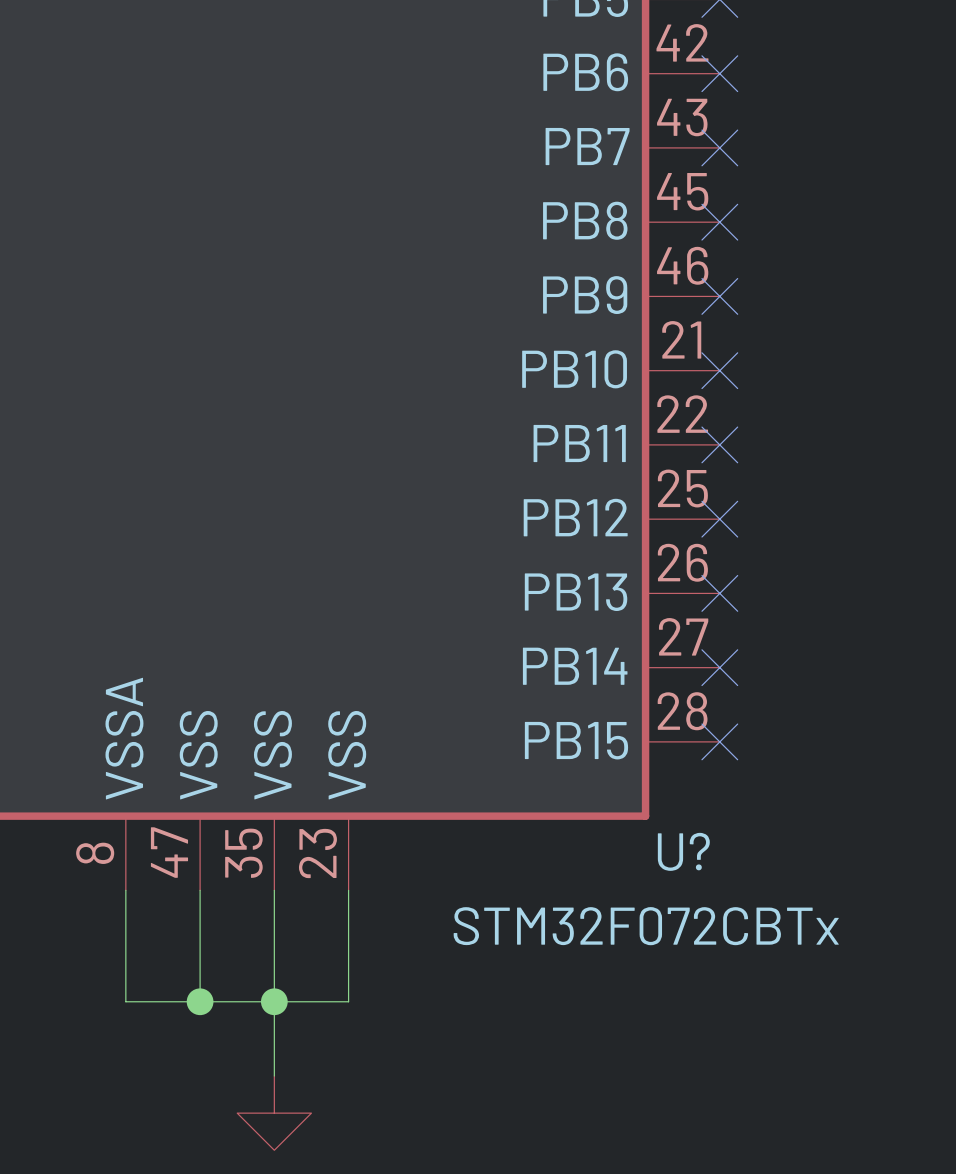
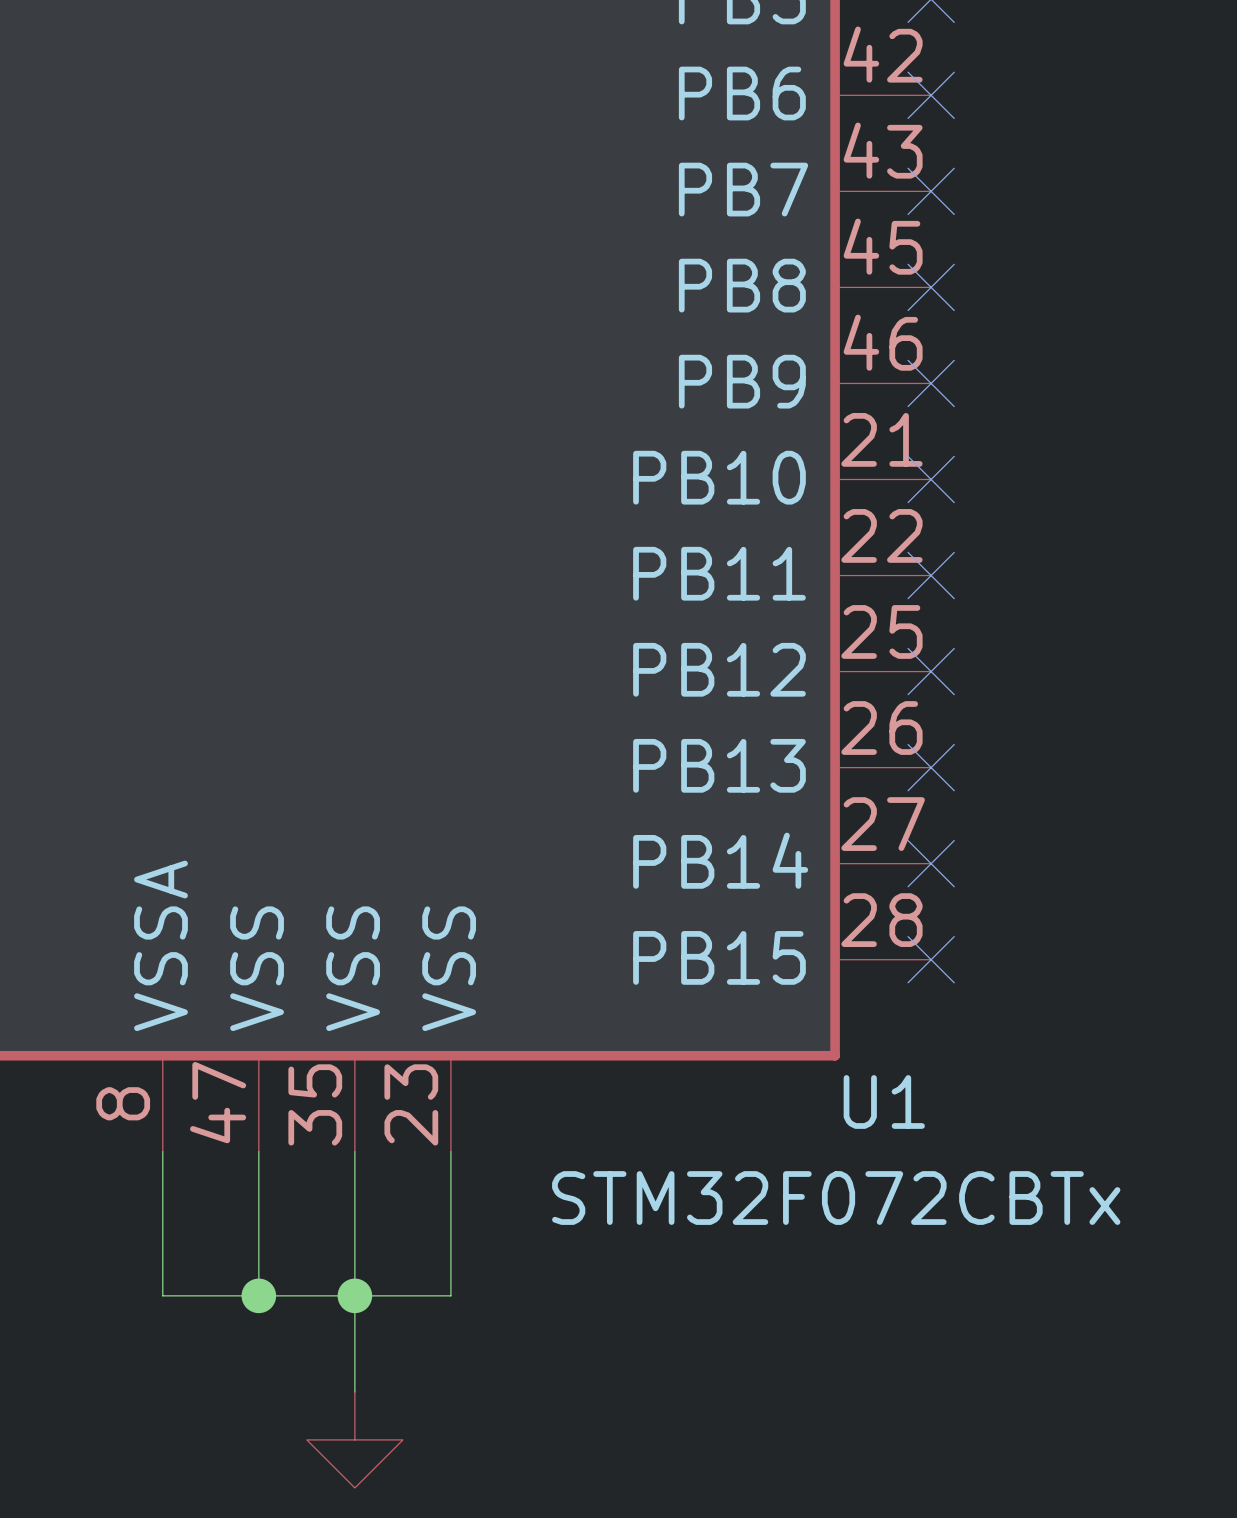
U? name: U? (683, 851) -> U1 (884, 1101)

